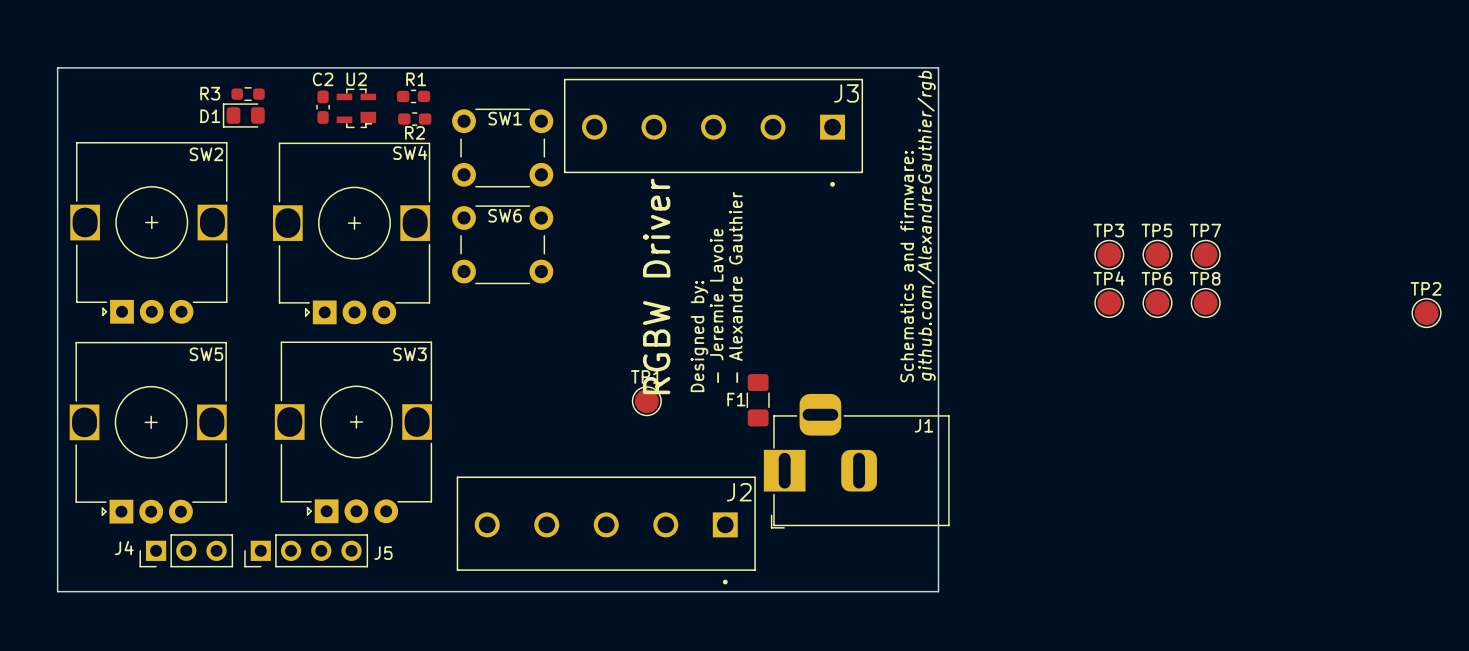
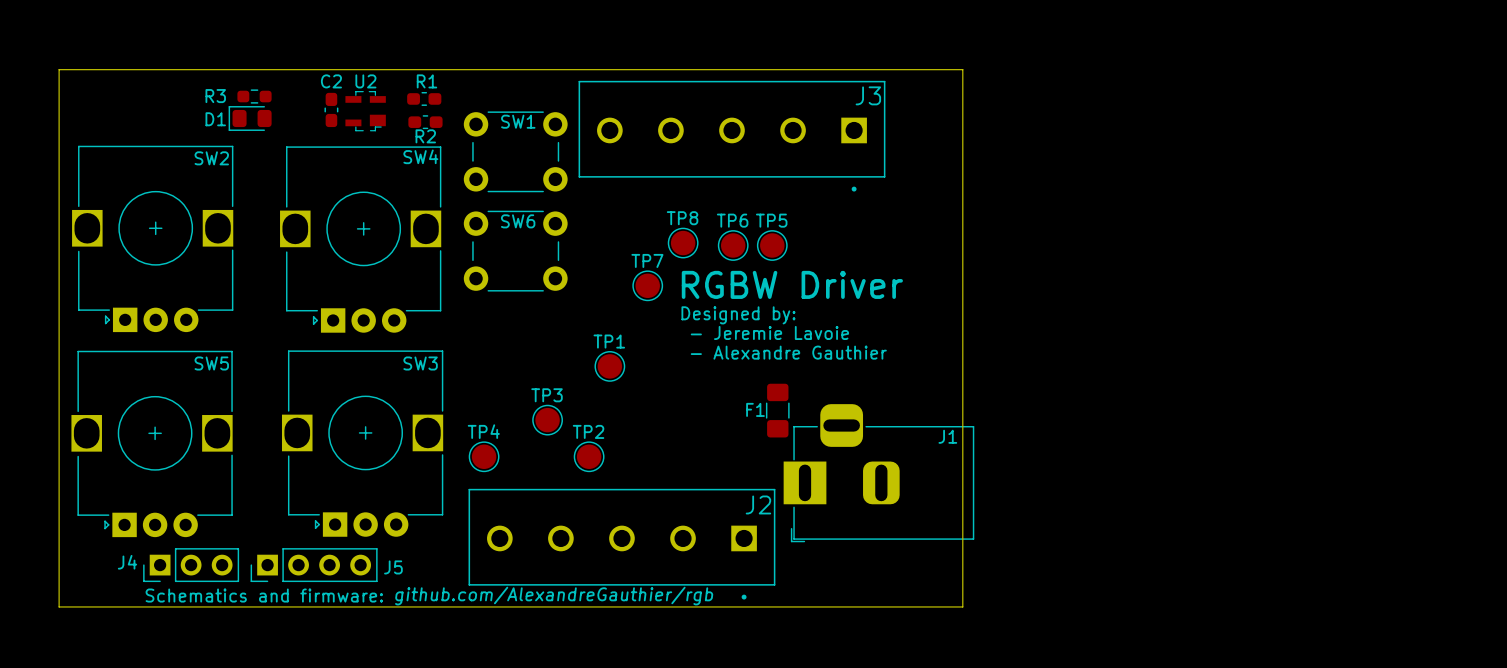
text: github.com/AlexandreGauthier/rgb (926, 225) -> none
TP3 position: (1109, 254) -> (547, 420)
TP5 position: (1157, 254) -> (772, 245)
TP7 position: (1205, 254) -> (647, 285)
text: Schematics and firmware: (907, 266) -> none
text rotation: 0° (656, 286) -> 90° clockwise (792, 284)
text rotation: 0° (735, 287) -> 90° clockwise (788, 352)
TP4 position: (1109, 302) -> (484, 456)
TP6 position: (1157, 302) -> (733, 245)
TP8 position: (1205, 302) -> (683, 243)
text rotation: 0° (716, 305) -> 90° clockwise (769, 332)
TP2 position: (1426, 313) -> (589, 456)
text rotation: 0° (699, 336) -> 90° clockwise (738, 315)
TP1 position: (646, 401) -> (609, 366)
text: none -> Schematics and firmware: (264, 595)
text: none -> github.com/AlexandreGauthier/rgb (554, 596)

